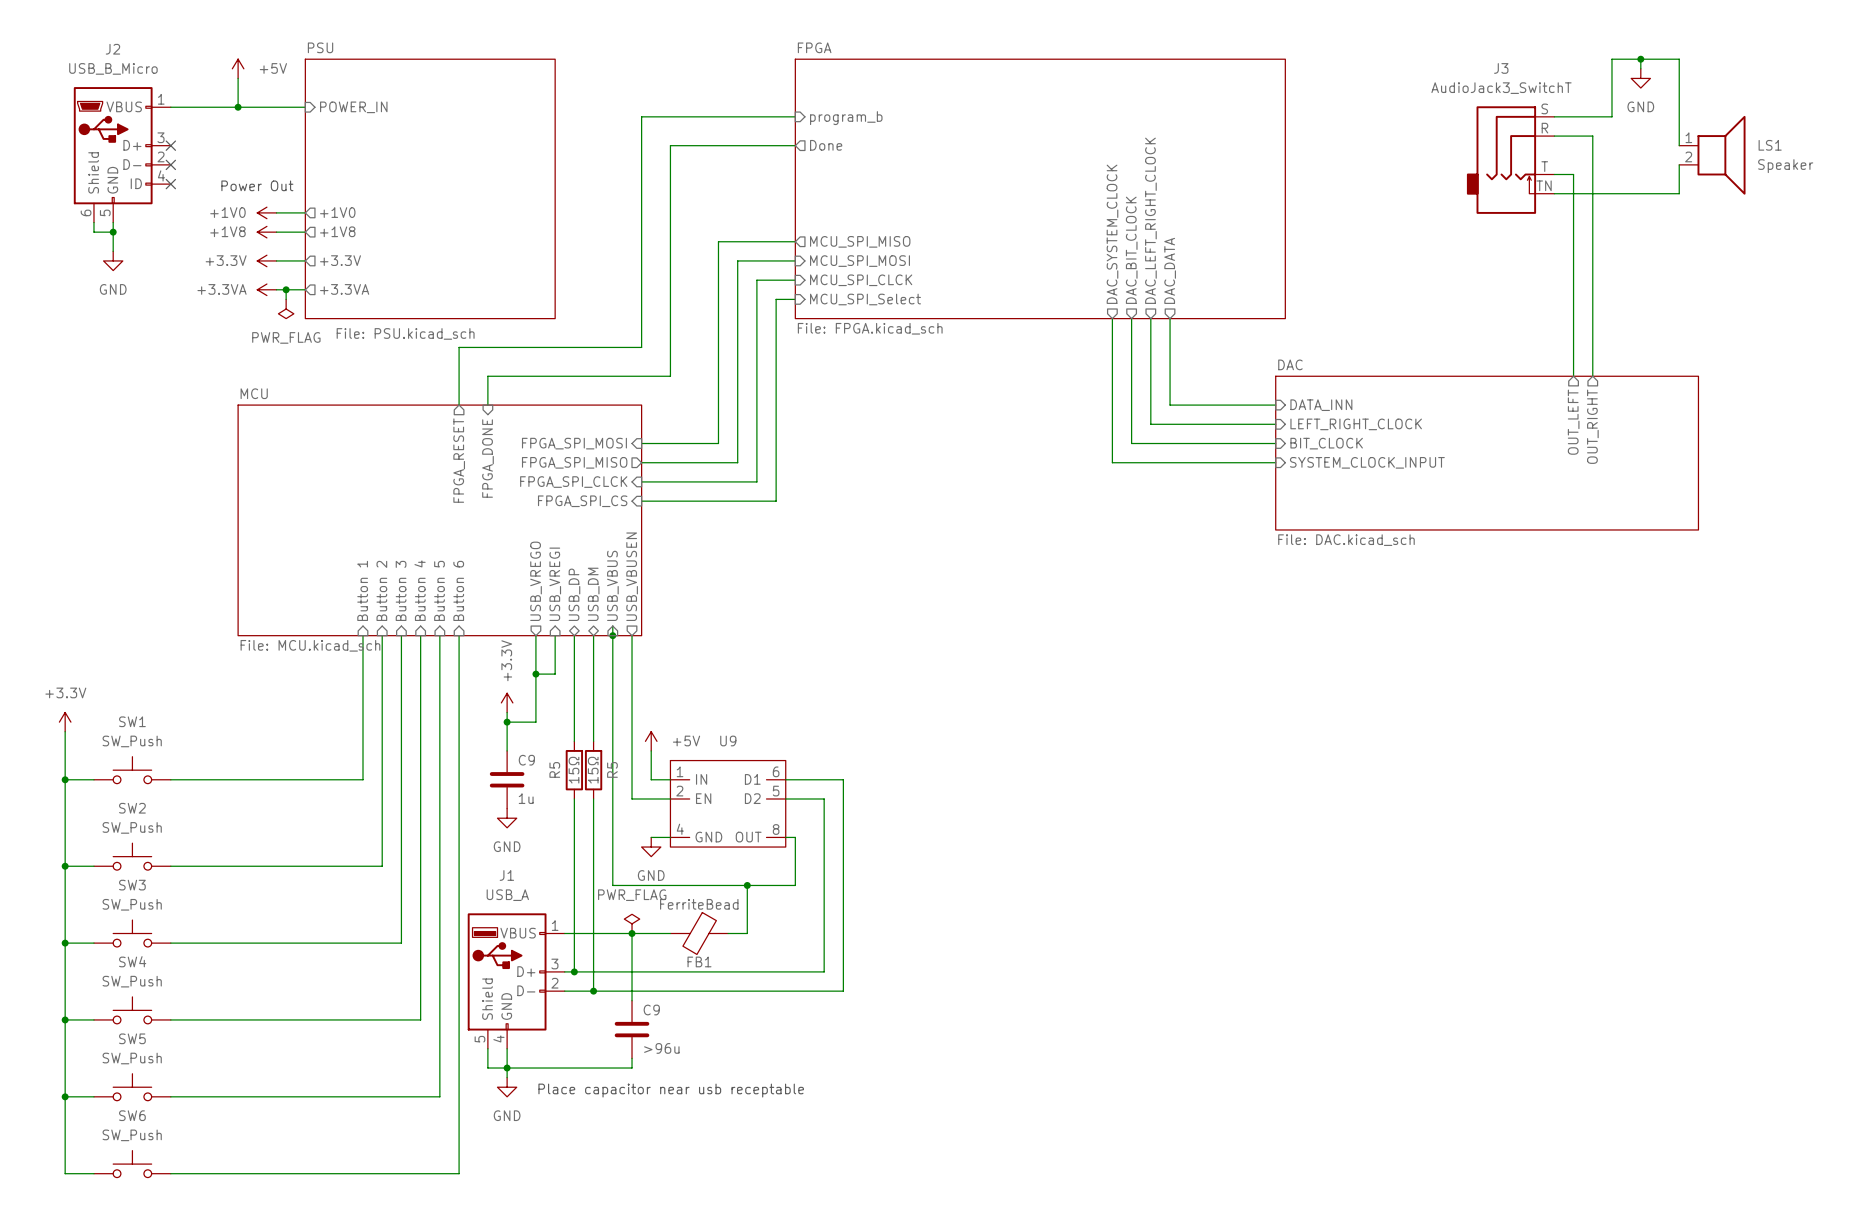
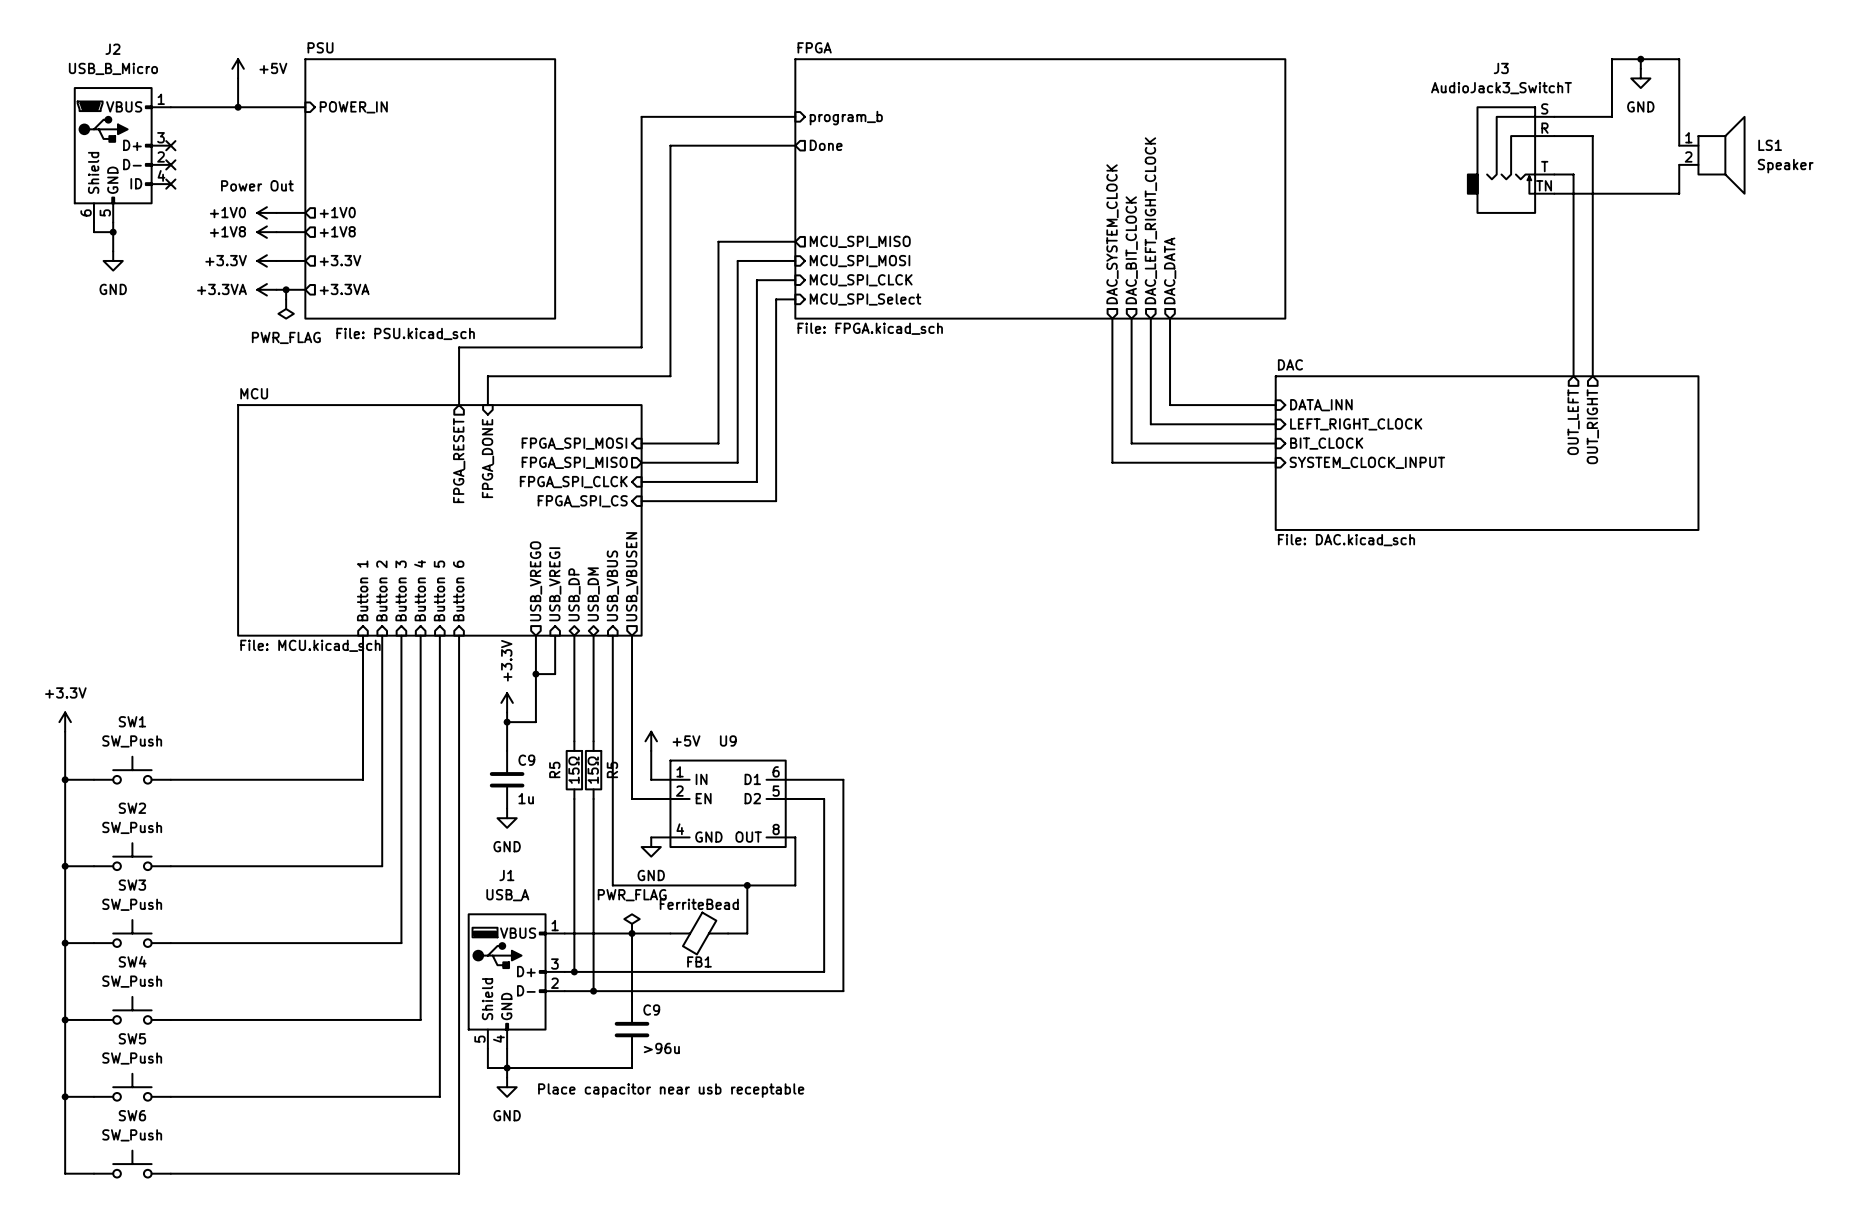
wire: (612, 626) (612, 635) -> none
junction: (612, 635) -> none

